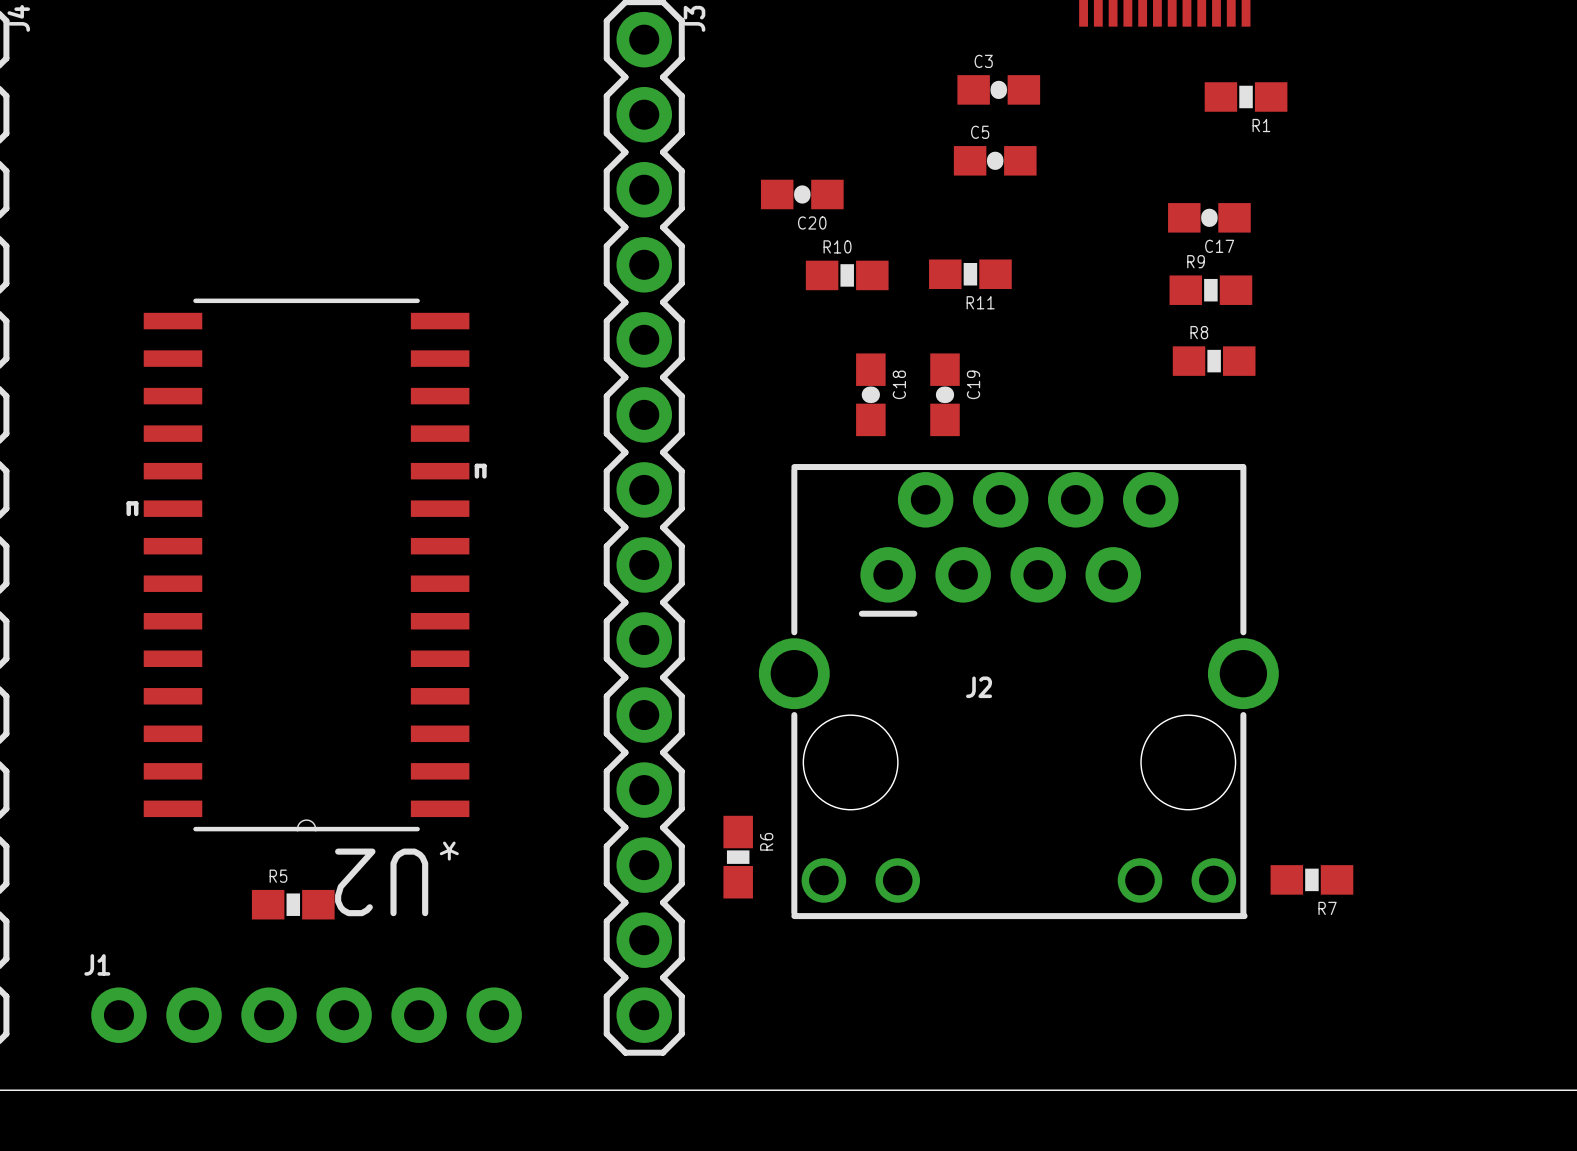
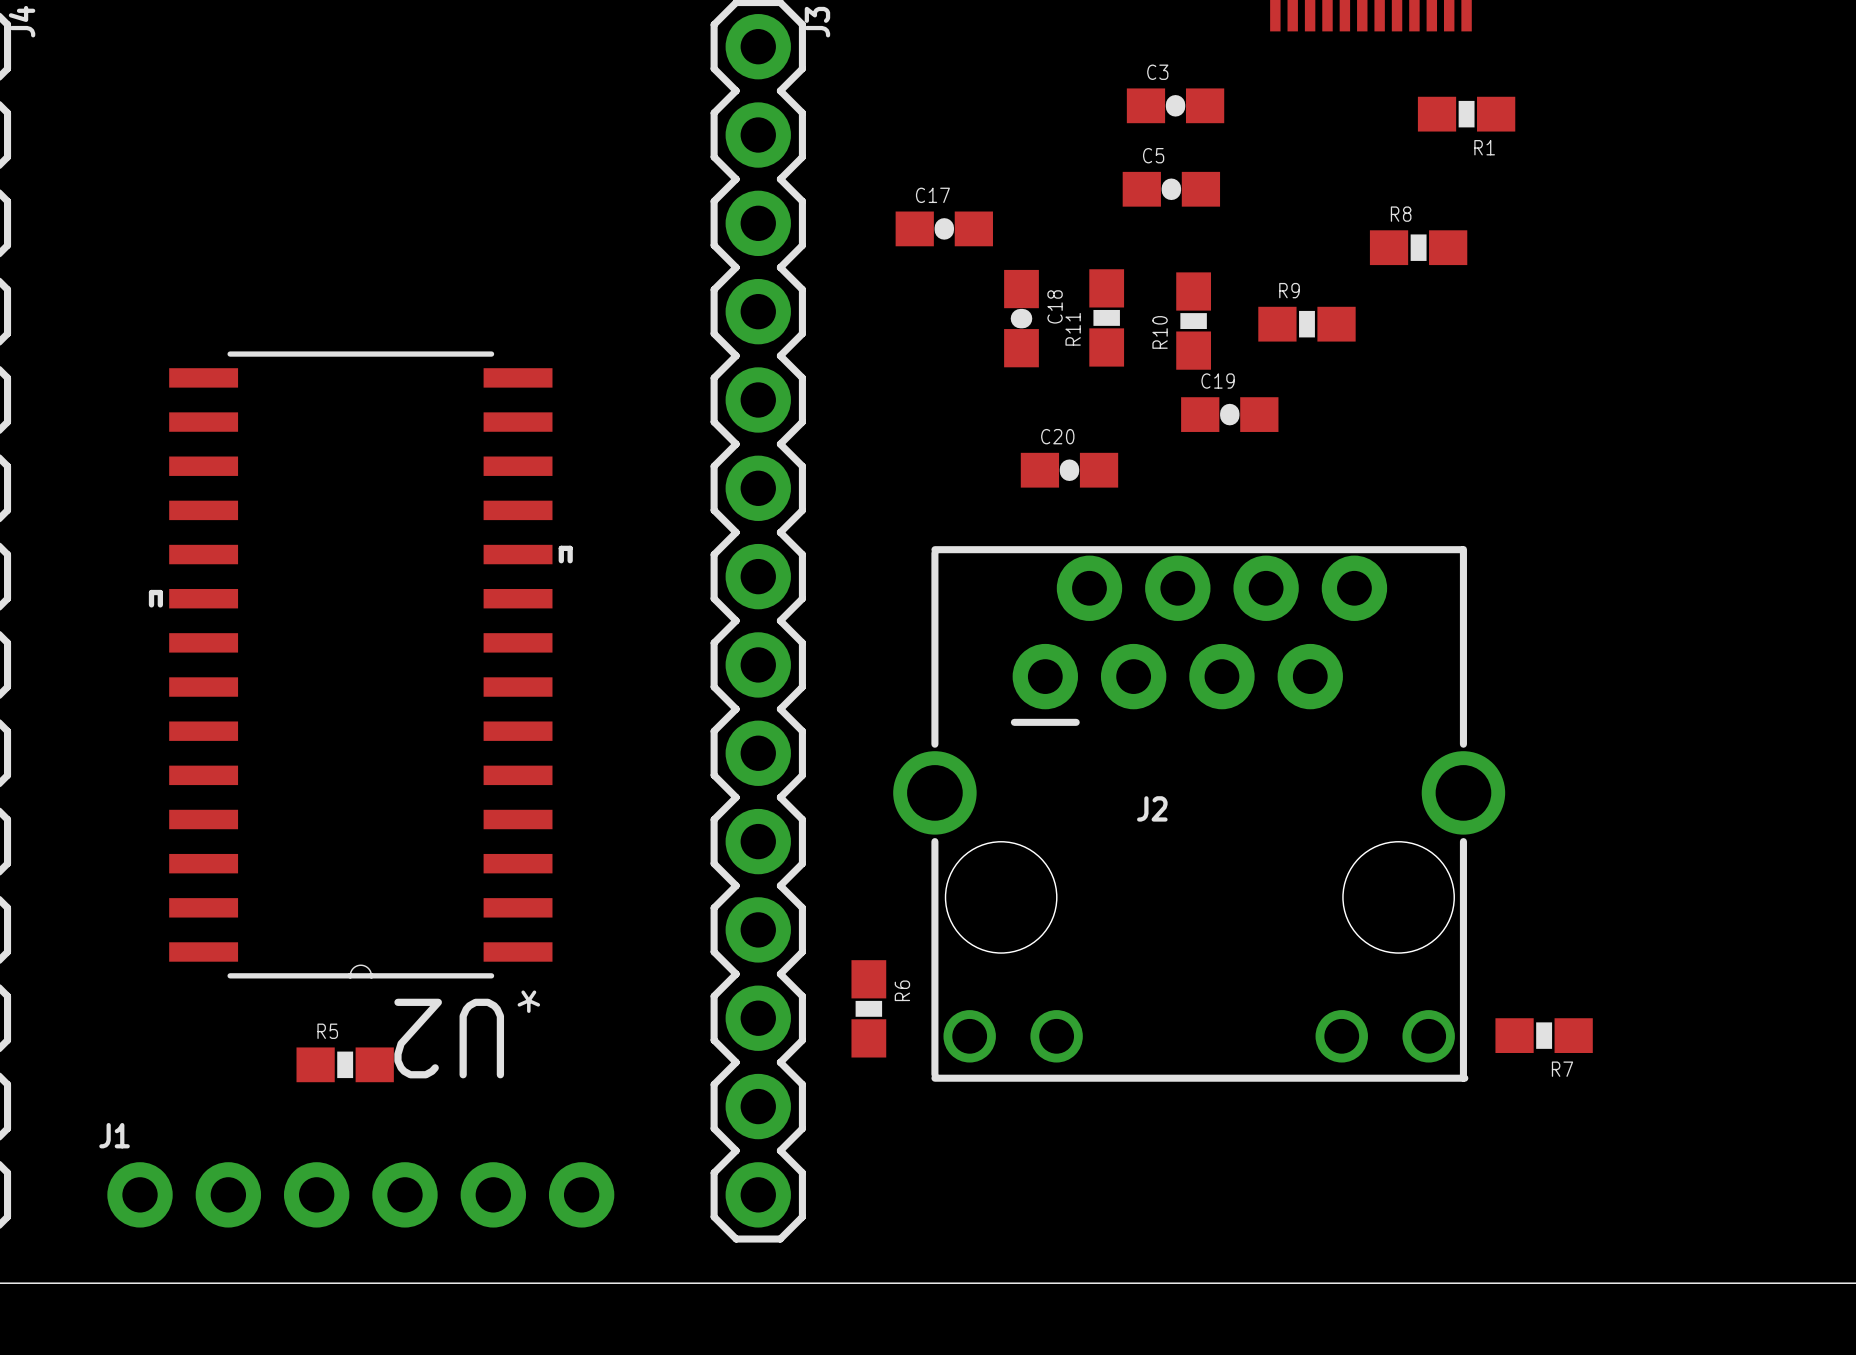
C17: (1209, 217) -> none
C20 name: C20 (812, 223) -> C17 (932, 195)
R11 rotation: 0° (970, 274) -> 90° clockwise (1106, 317)
R10 rotation: 0° (847, 275) -> 90° clockwise (1193, 321)
R10 position: (847, 275) -> (1193, 321)
R9 position: (1210, 290) -> (1306, 324)
R8 position: (1214, 361) -> (1418, 247)
C18 position: (870, 394) -> (1021, 318)
C19 rotation: 0° (945, 394) -> 90° clockwise (1229, 414)
C19 position: (945, 394) -> (1229, 414)
C20: none -> (1069, 470)

